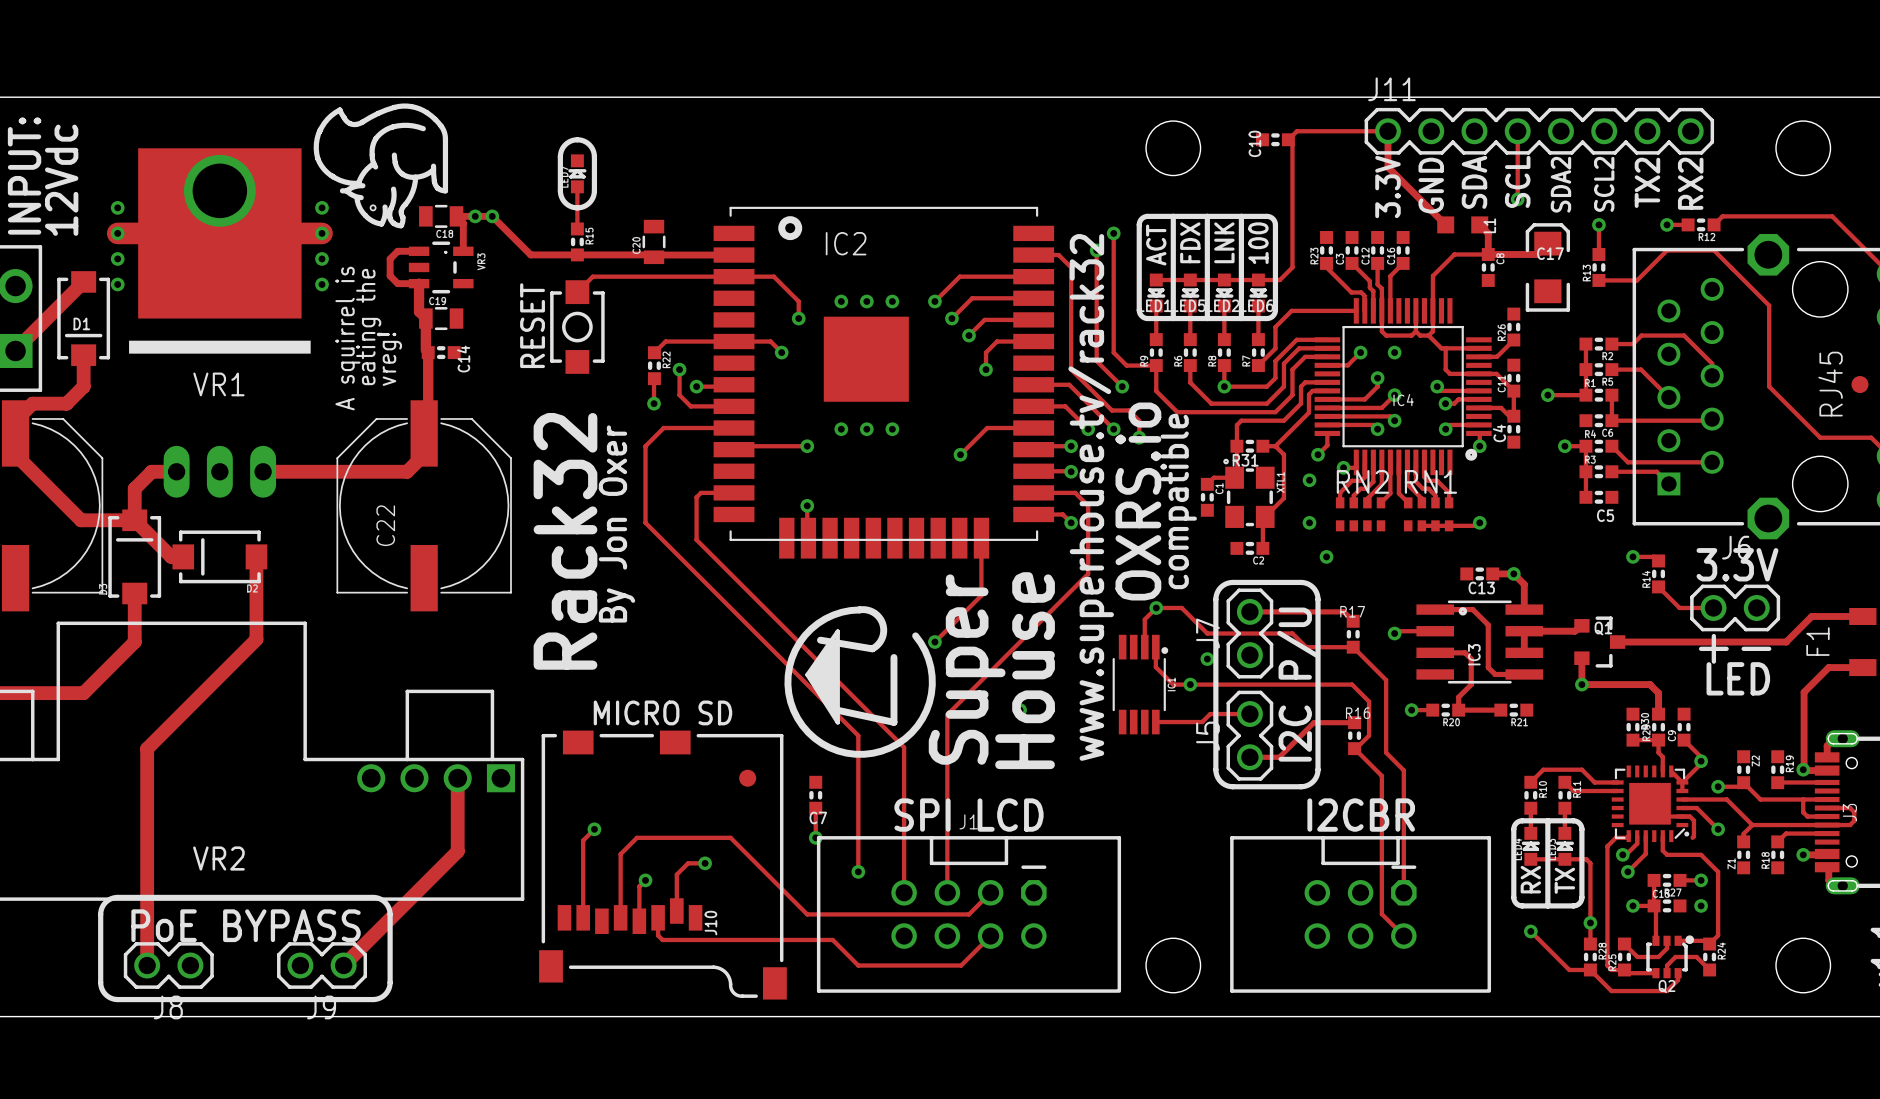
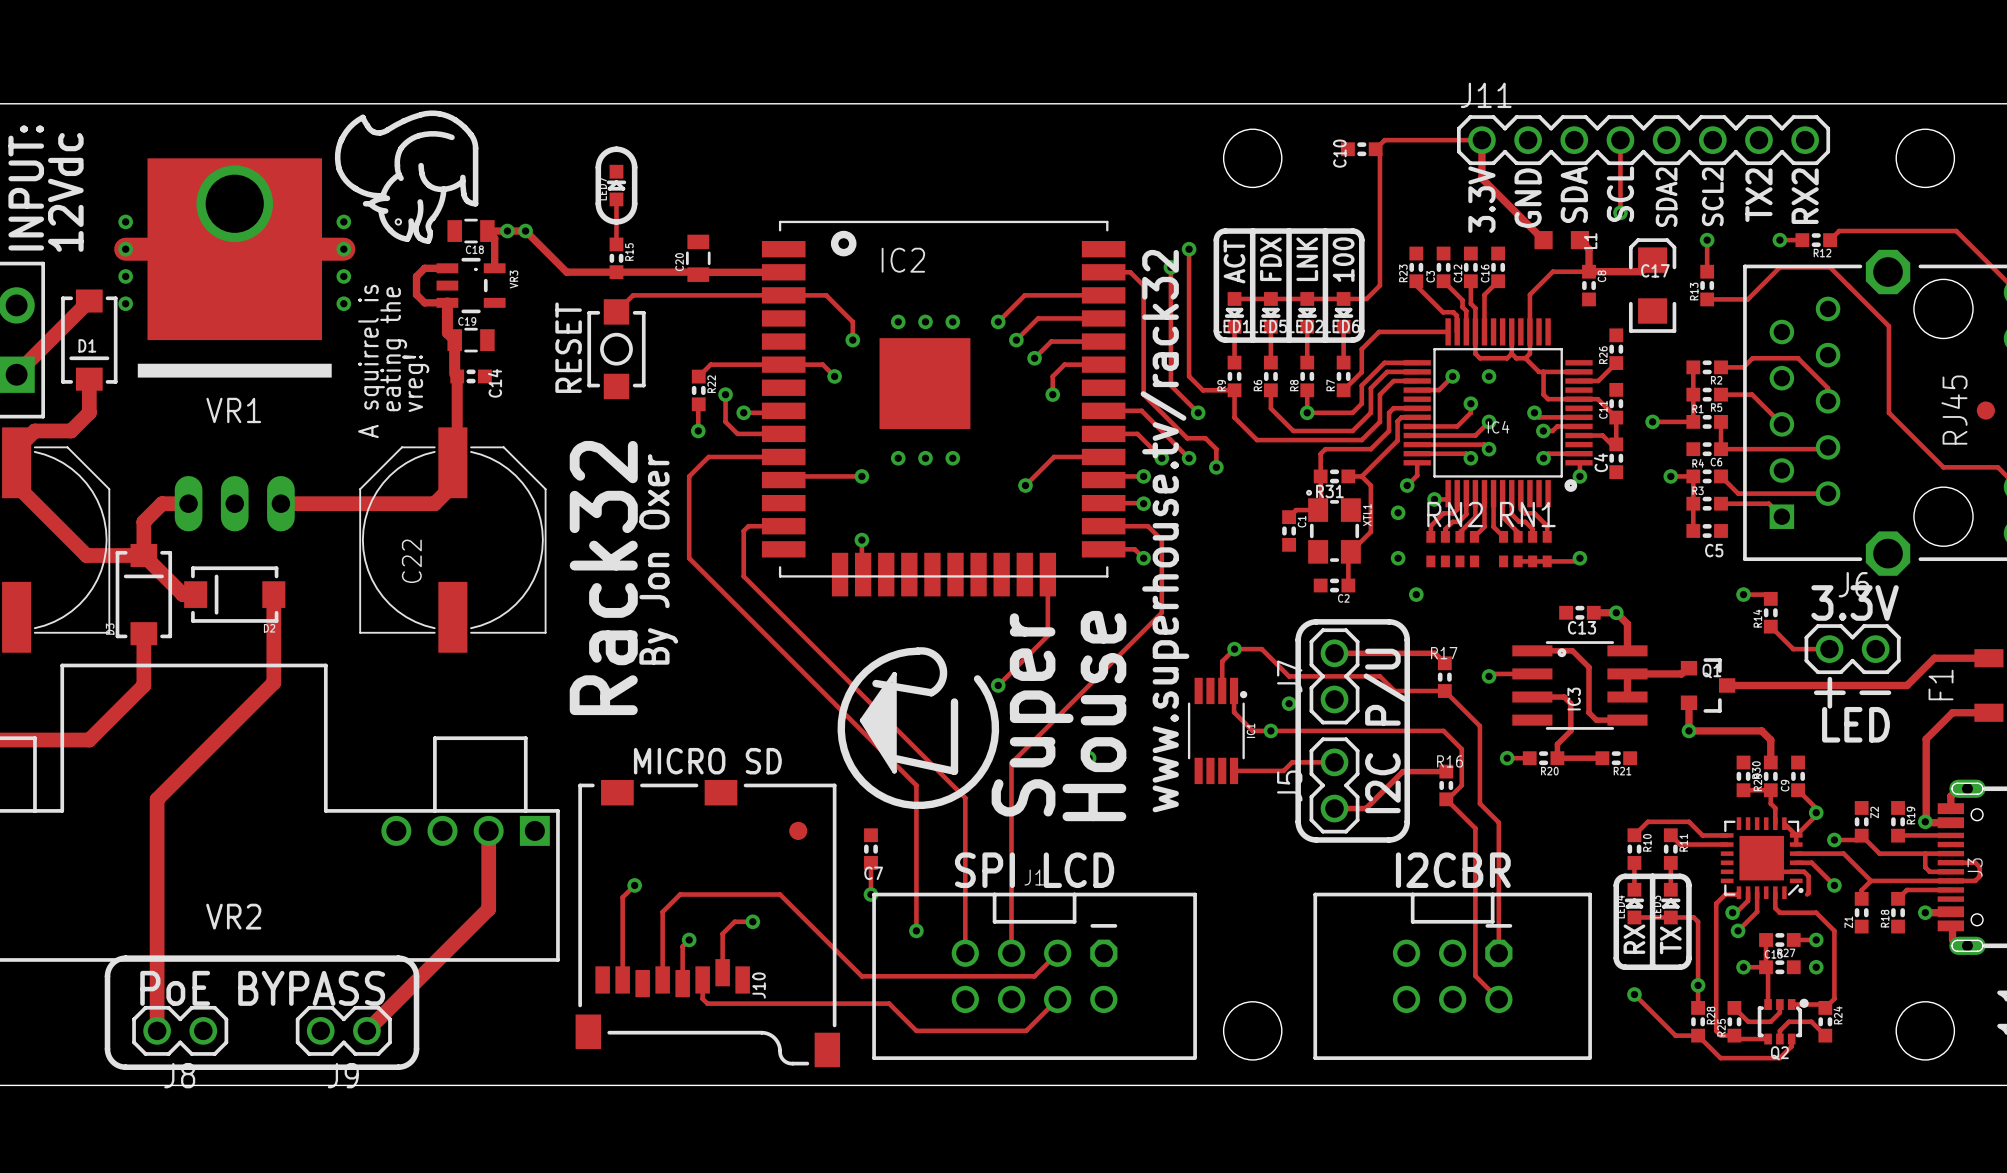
text: OXRS.io (1138, 501) -> none
text: compatible (1178, 501) -> none

